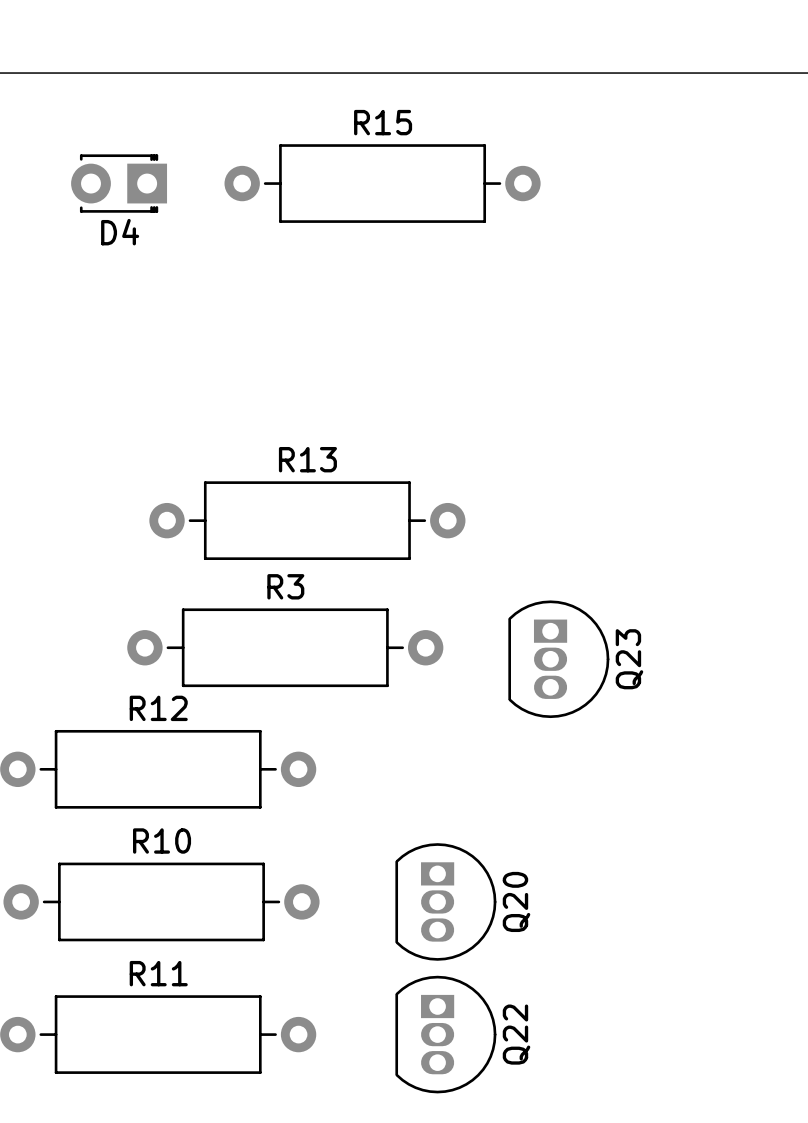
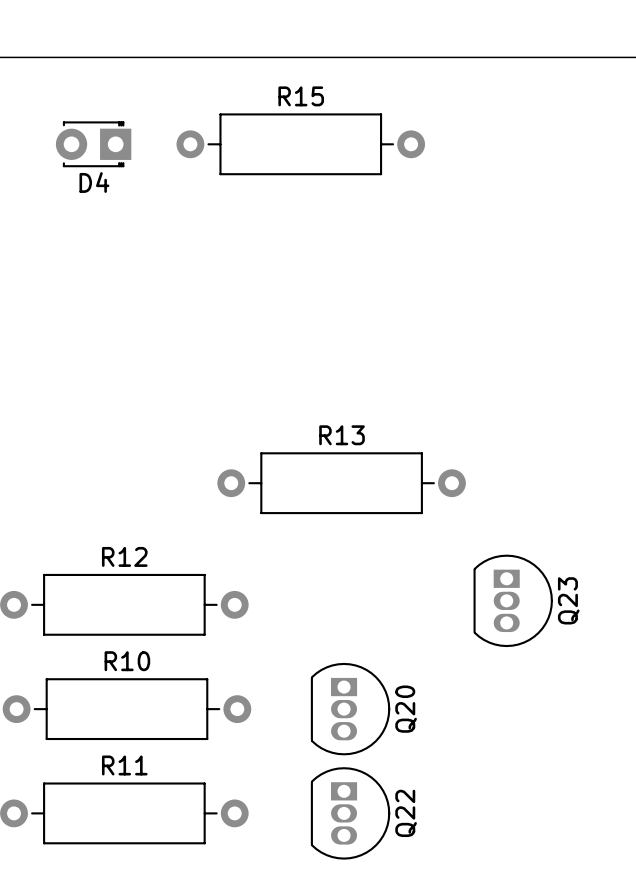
R13 position: (307, 520) -> (341, 483)
R3: (285, 647) -> none
Q23 position: (558, 659) -> (513, 600)

